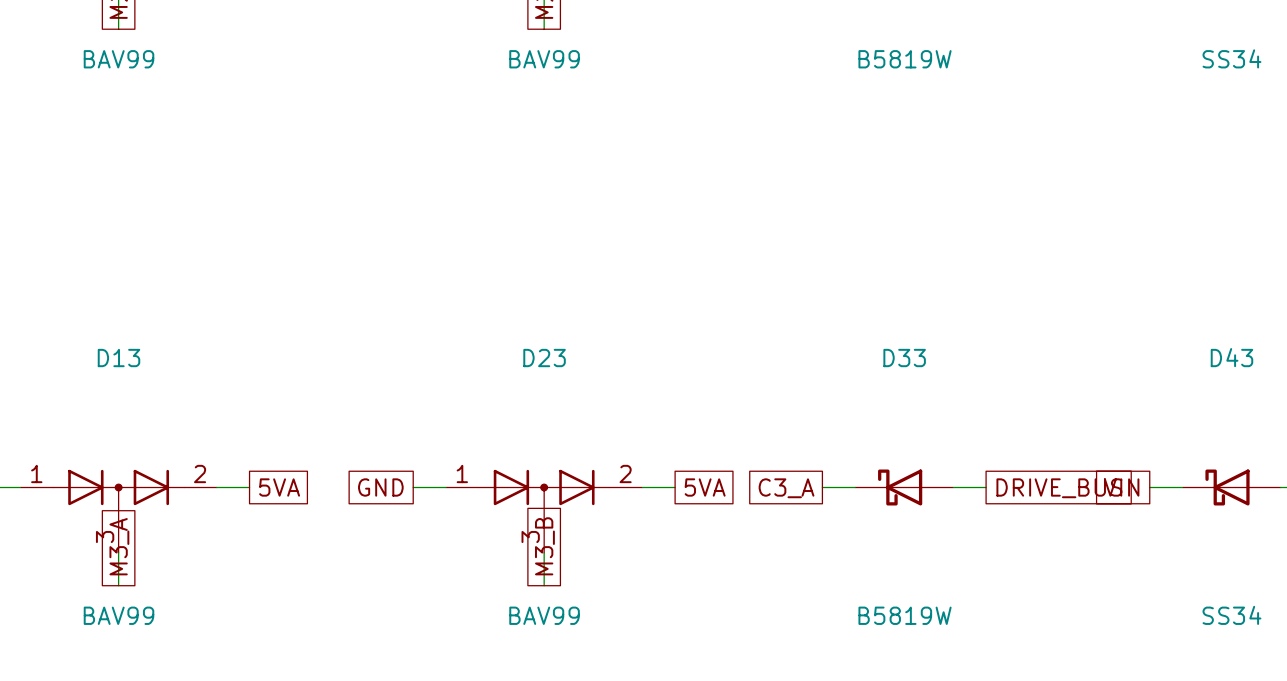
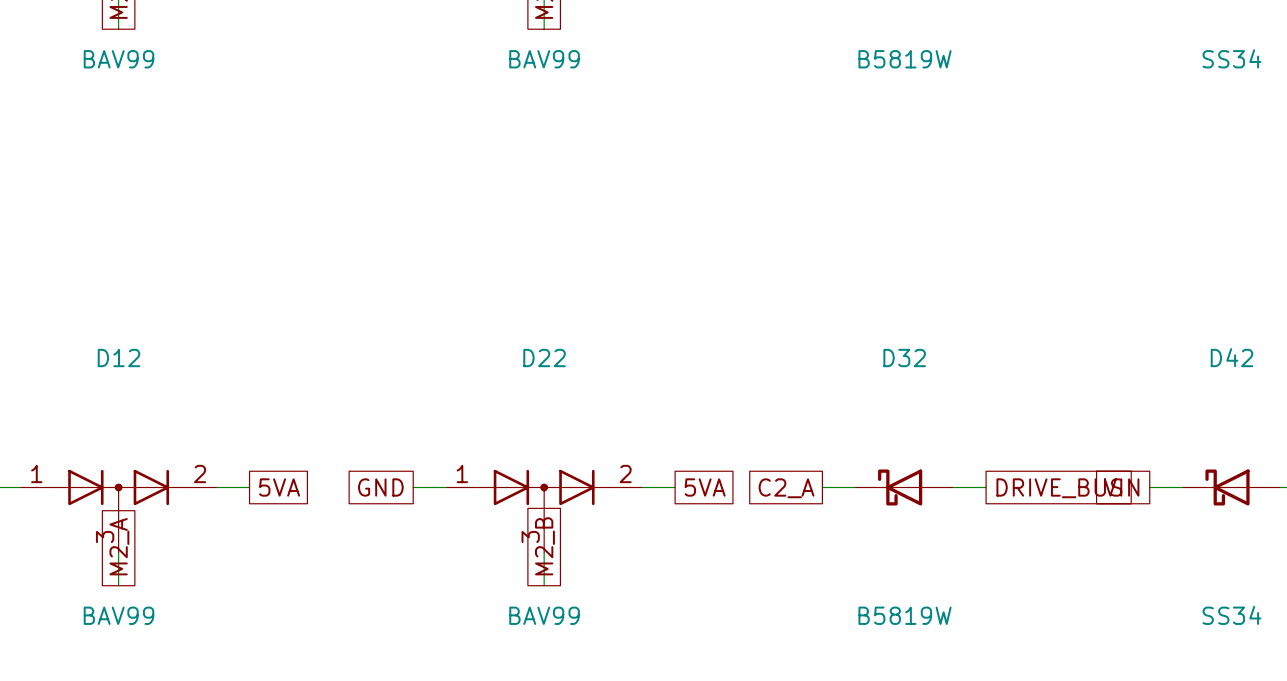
D43 name: D43 (1231, 357) -> D42 (1231, 357)
D13 name: D13 (119, 358) -> D12 (119, 358)
D23 name: D23 (544, 358) -> D22 (544, 358)
D33 name: D33 (904, 358) -> D32 (904, 358)
global label: C3_A (786, 488) -> C2_A (786, 488)
global label: M3_A (119, 546) -> M2_A (119, 546)
global label: M3_B (544, 546) -> M2_B (544, 546)

